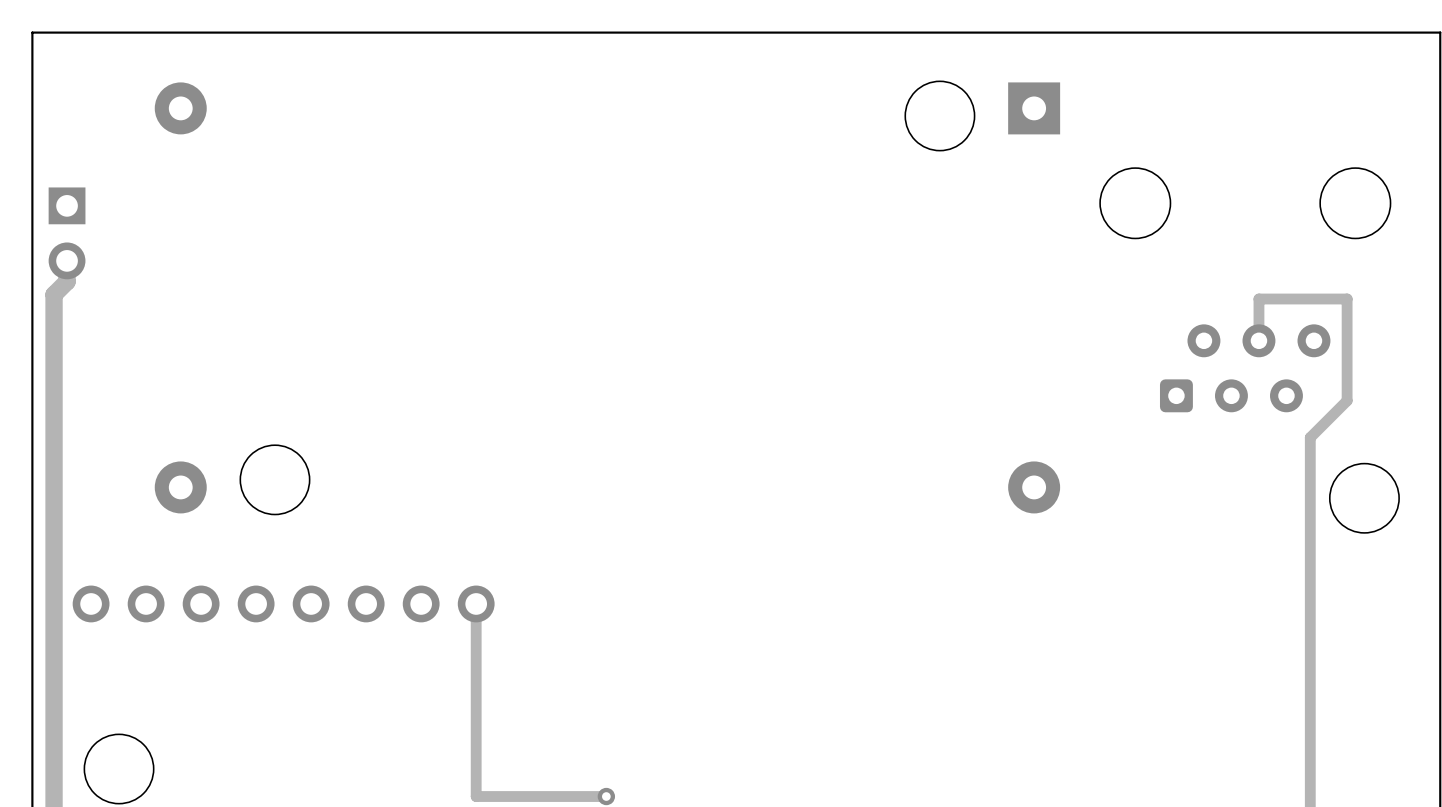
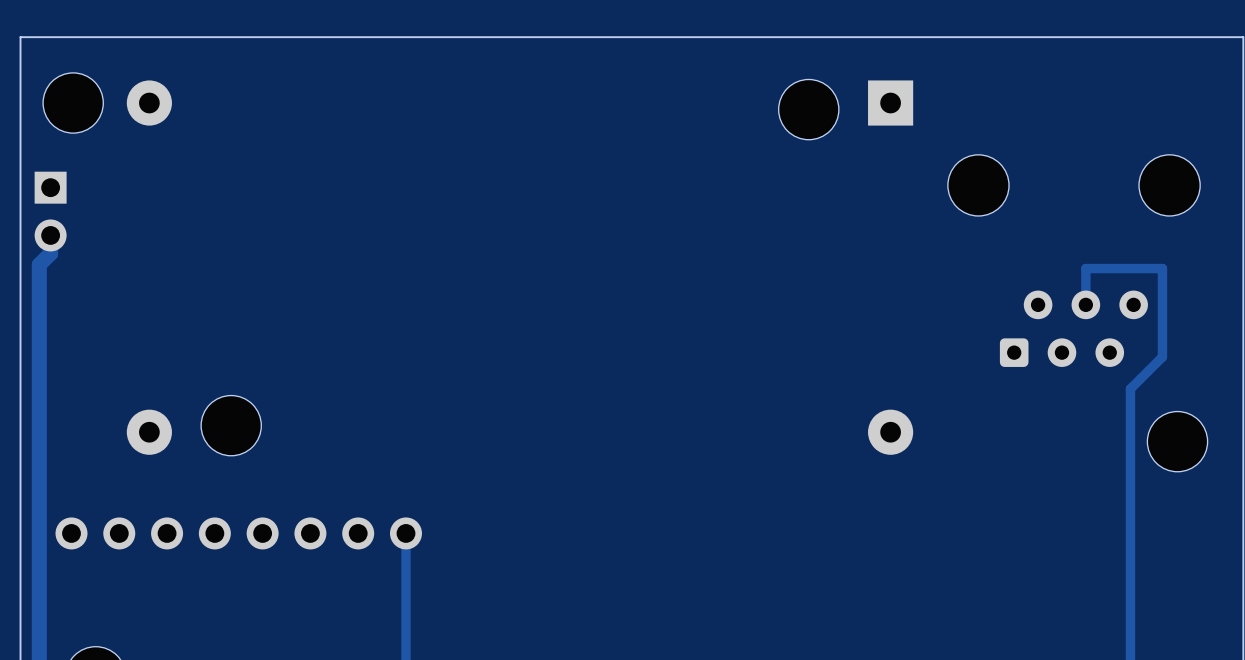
part: none -> (73, 103)

